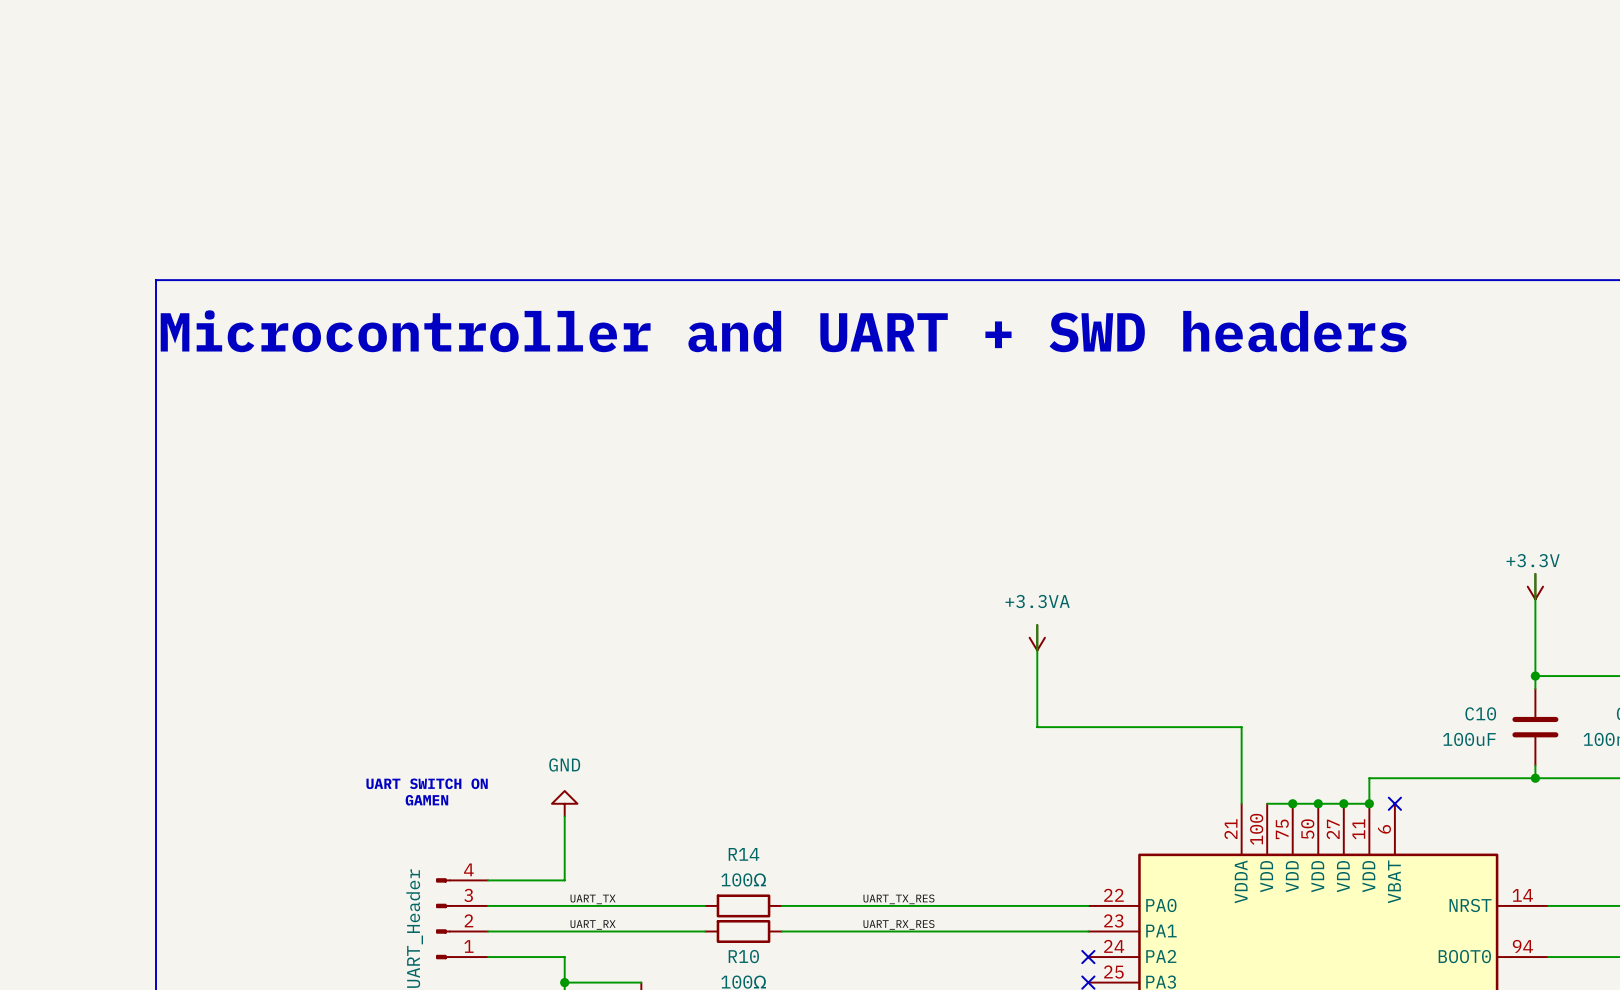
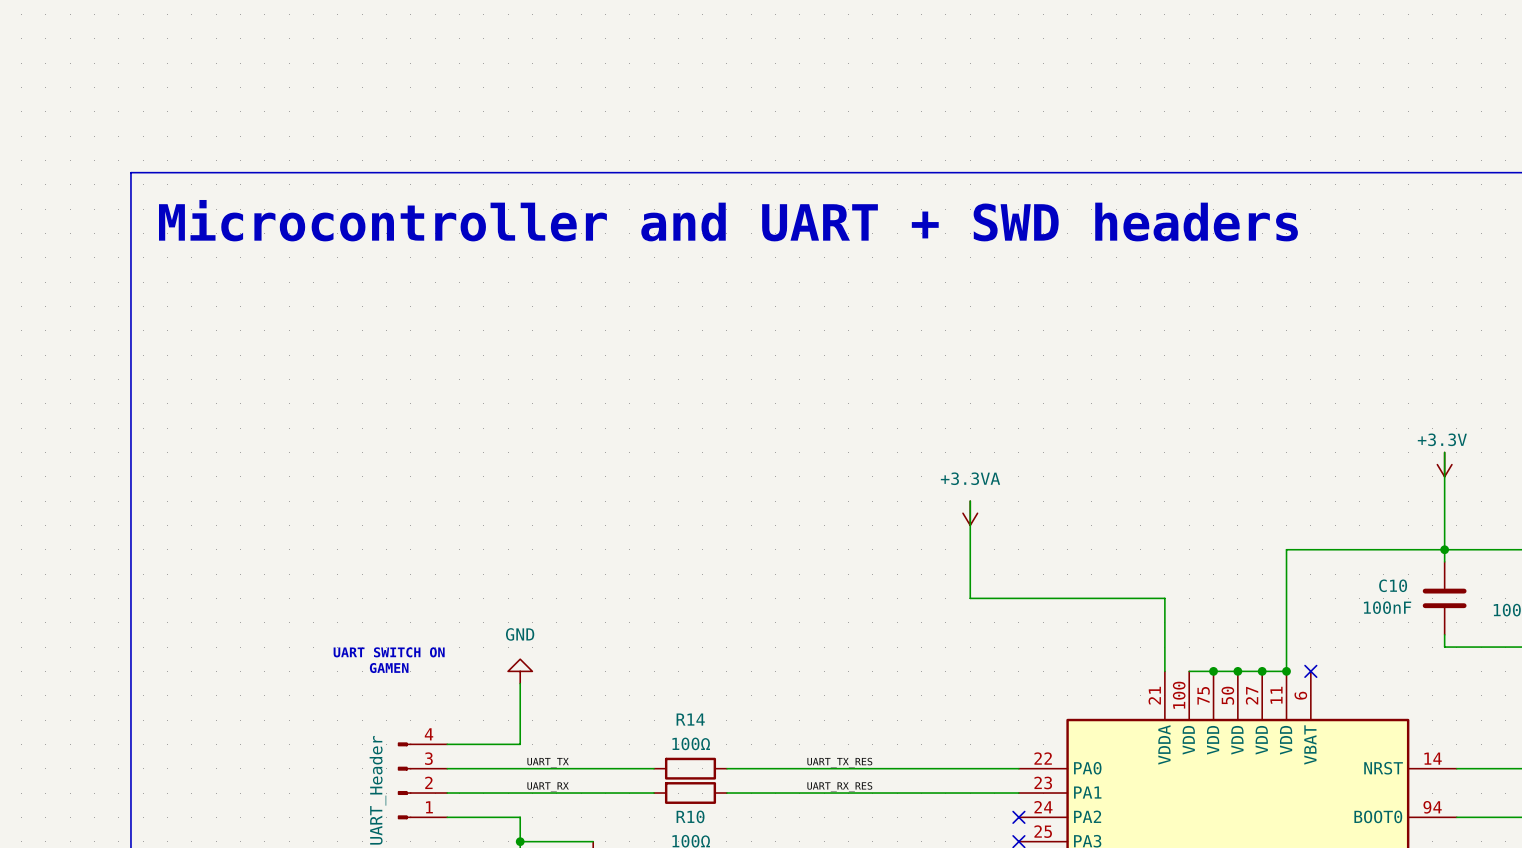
C10 value: 100uF (1469, 739) -> 100nF (1387, 607)
wire: (1369, 778) (1535, 778) -> (1286, 647) (1286, 549) (1444, 549)
junction: (1535, 778) -> none

